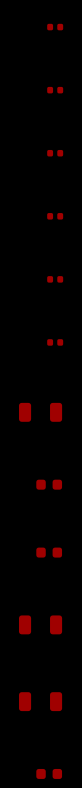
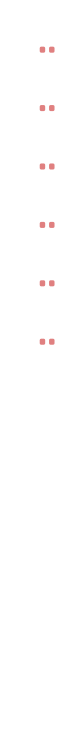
part: (40, 412) -> none
part: (49, 484) -> none
part: (49, 552) -> none
part: (40, 624) -> none
part: (40, 701) -> none
part: (49, 773) -> none

